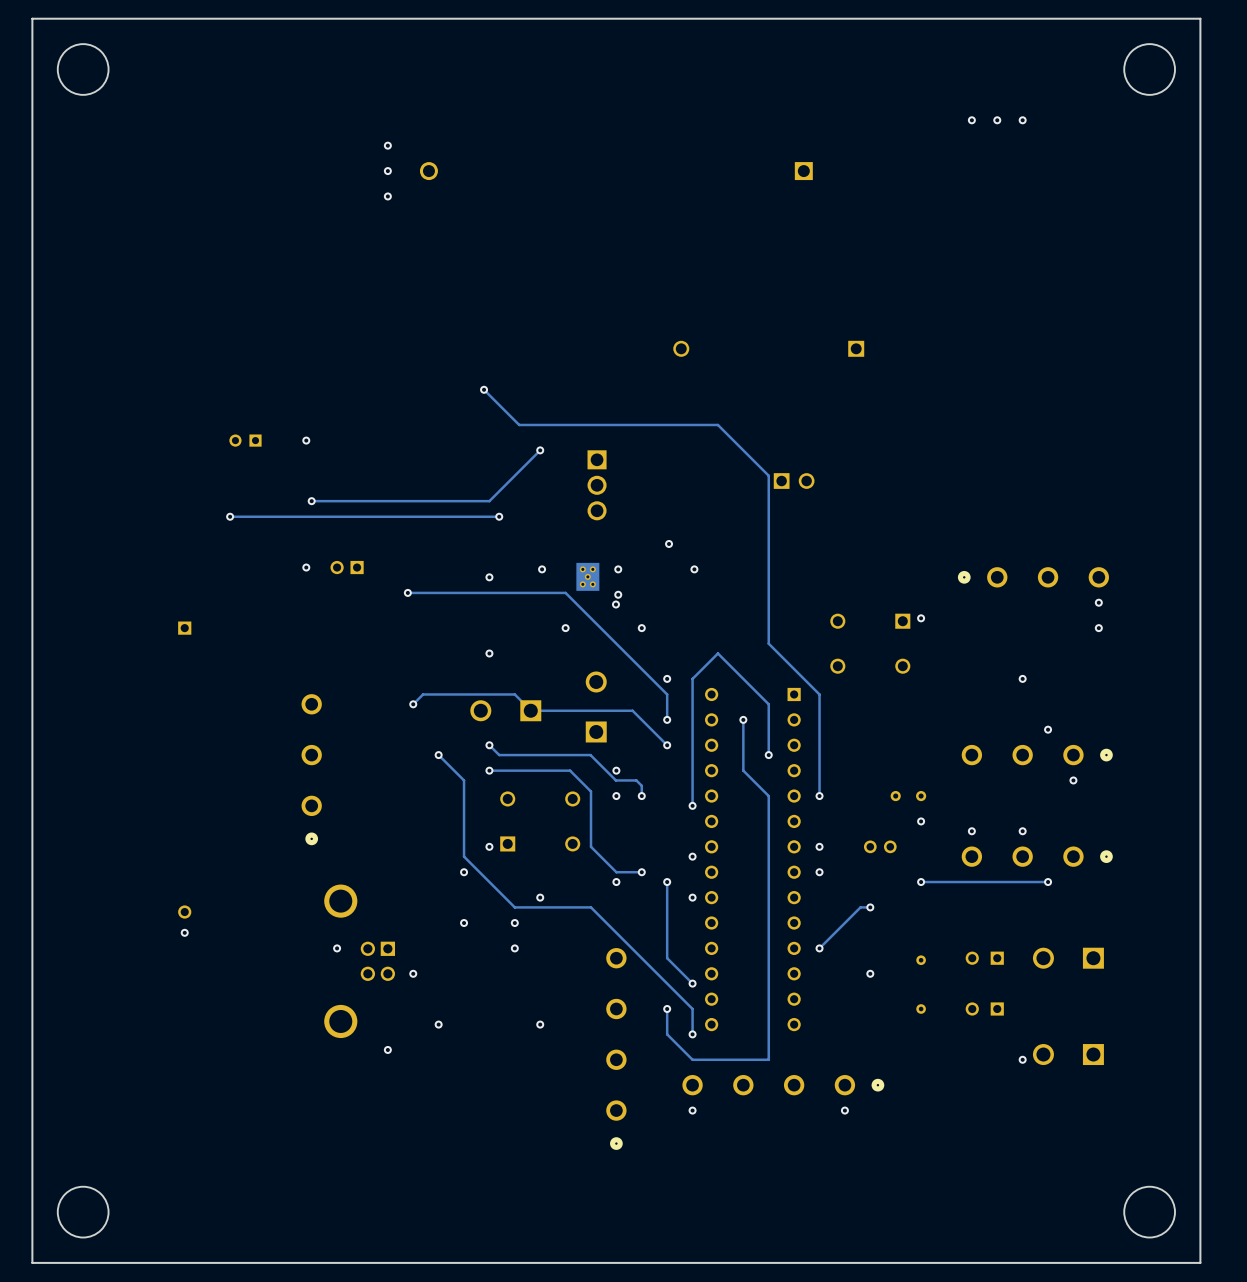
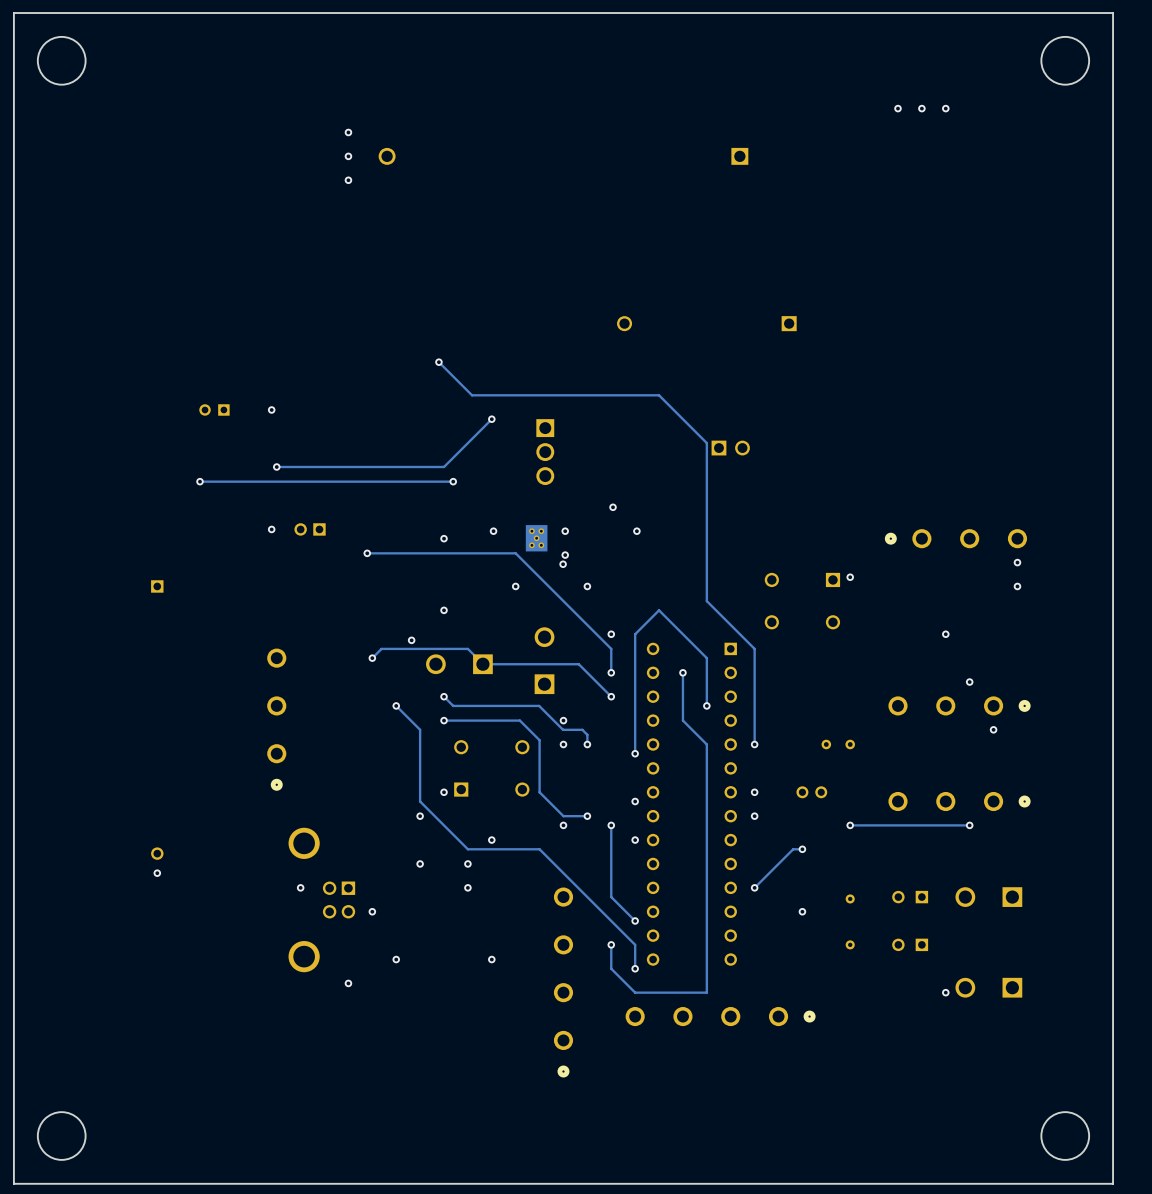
via: none -> (411, 640)
via: (921, 821) -> none
via: (971, 831) -> none
via: (1022, 831) -> none
via: (692, 1110) -> none
via: (844, 1110) -> none

